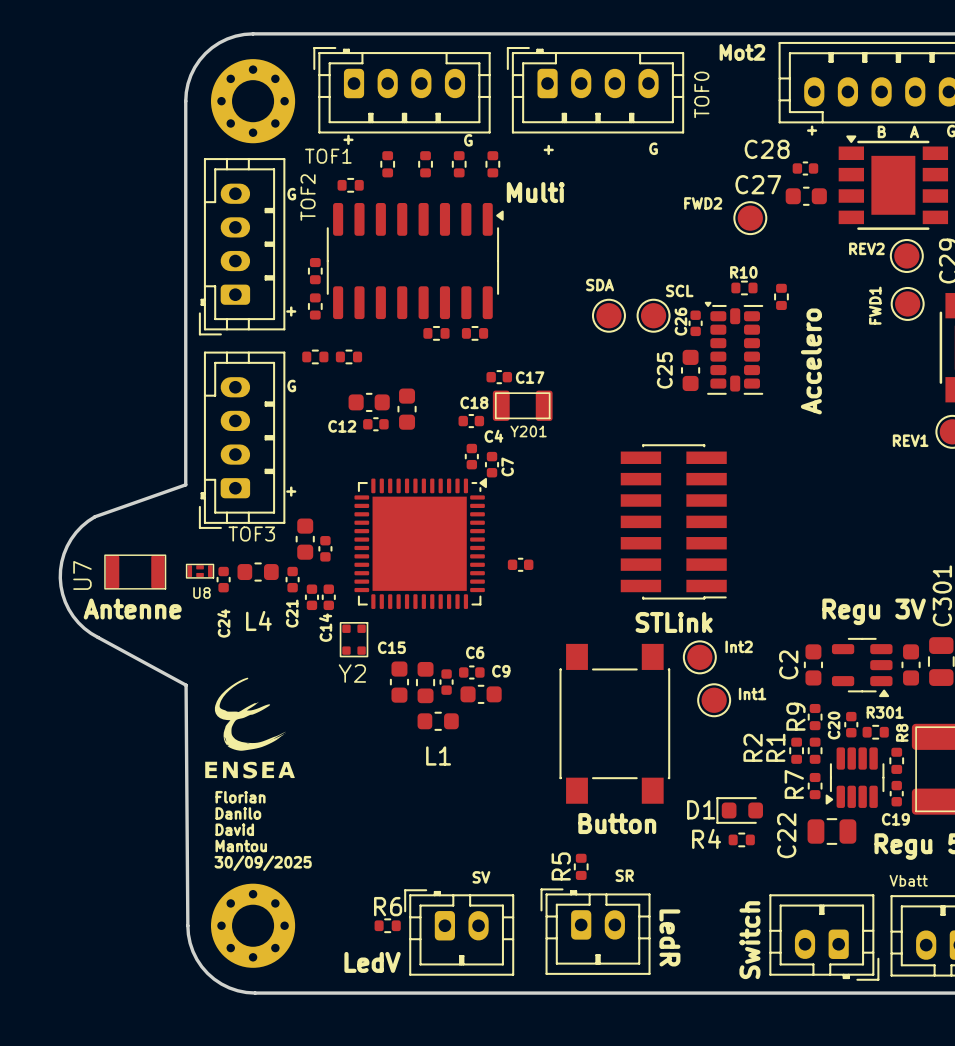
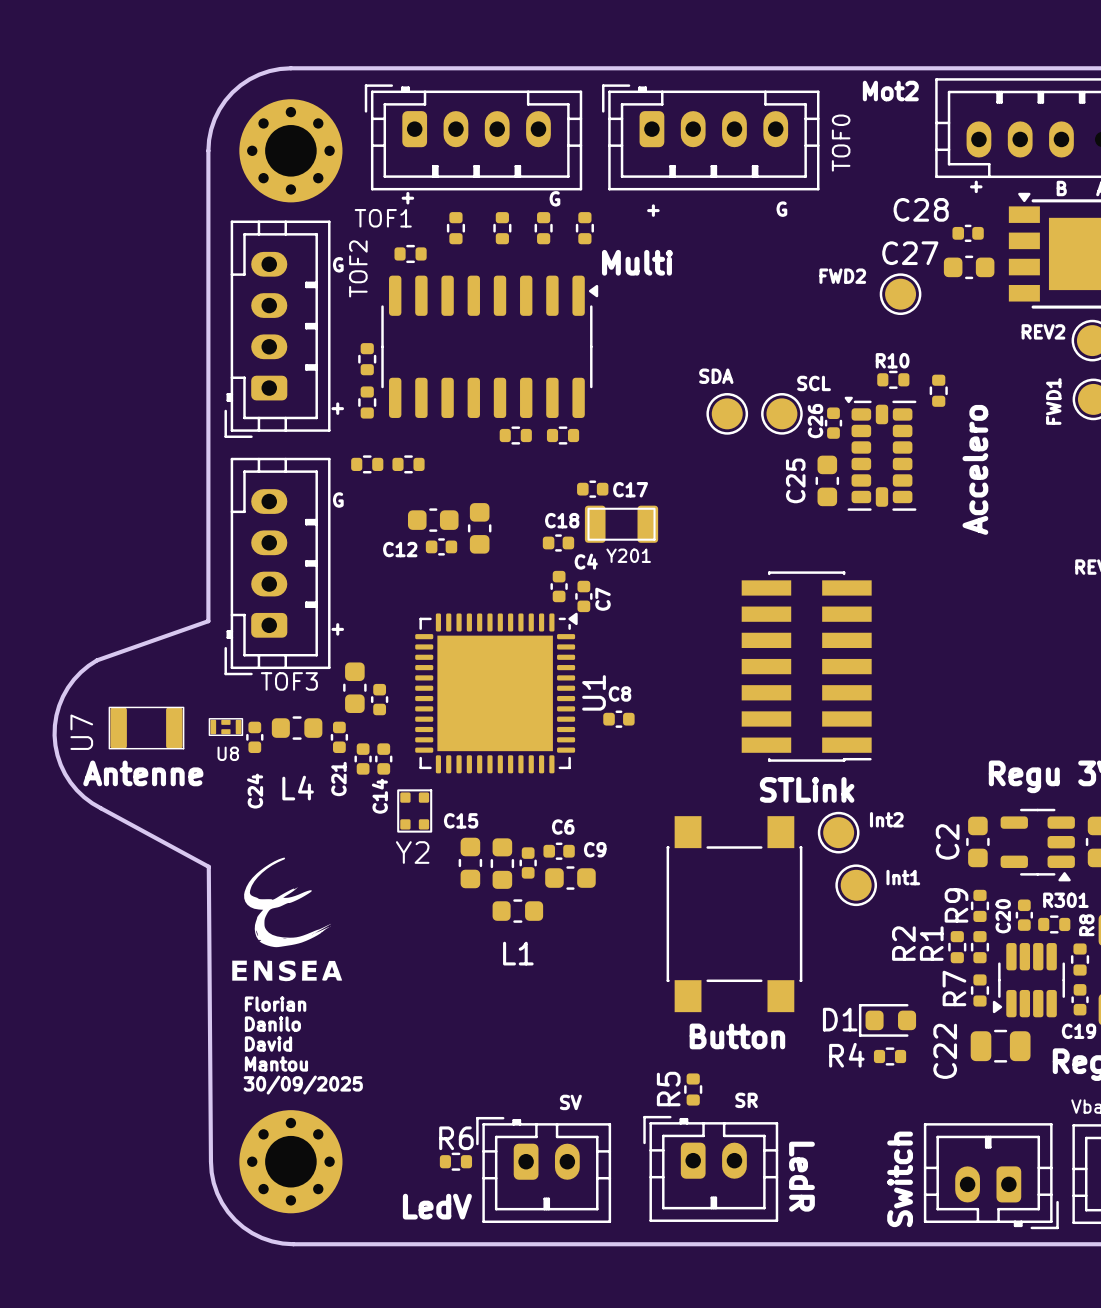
U1 name: none -> U1 (594, 692)
C8 name: none -> C8 (619, 693)

